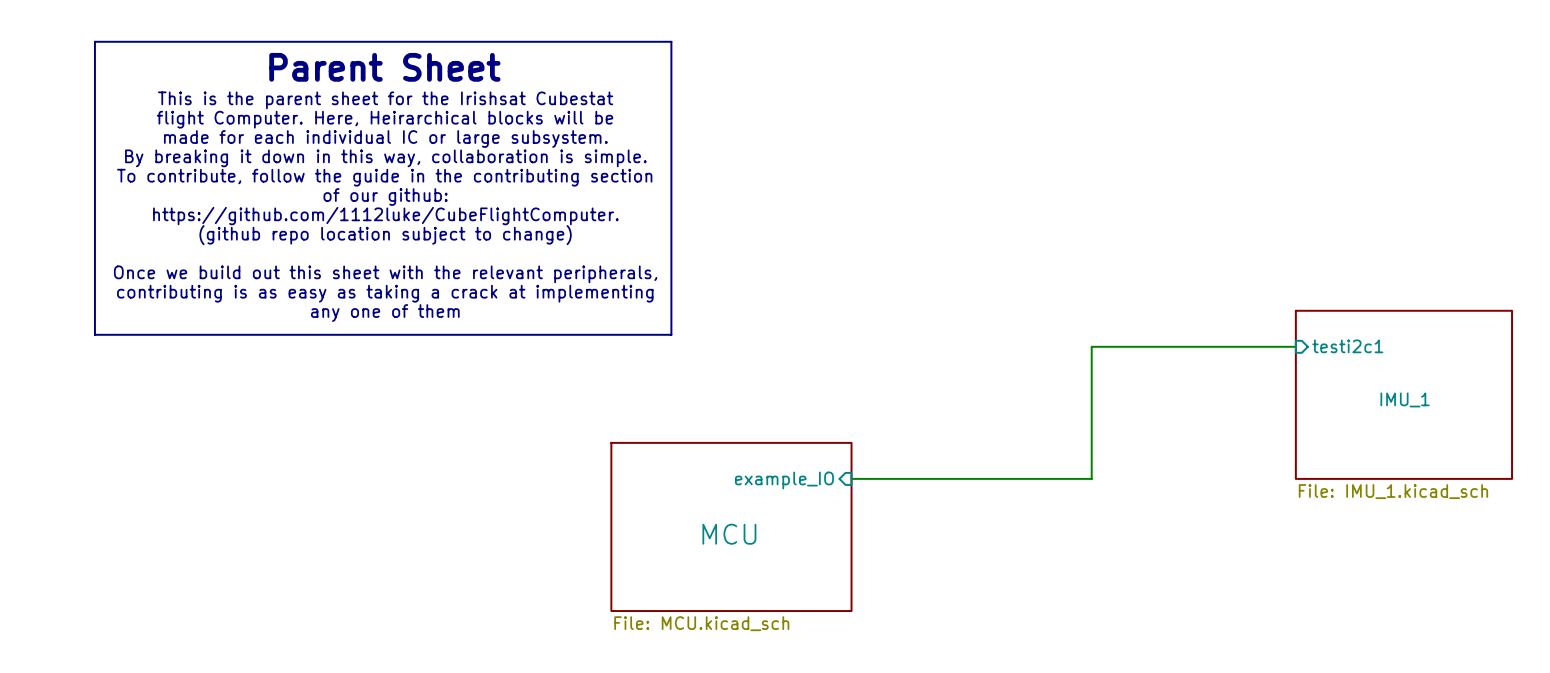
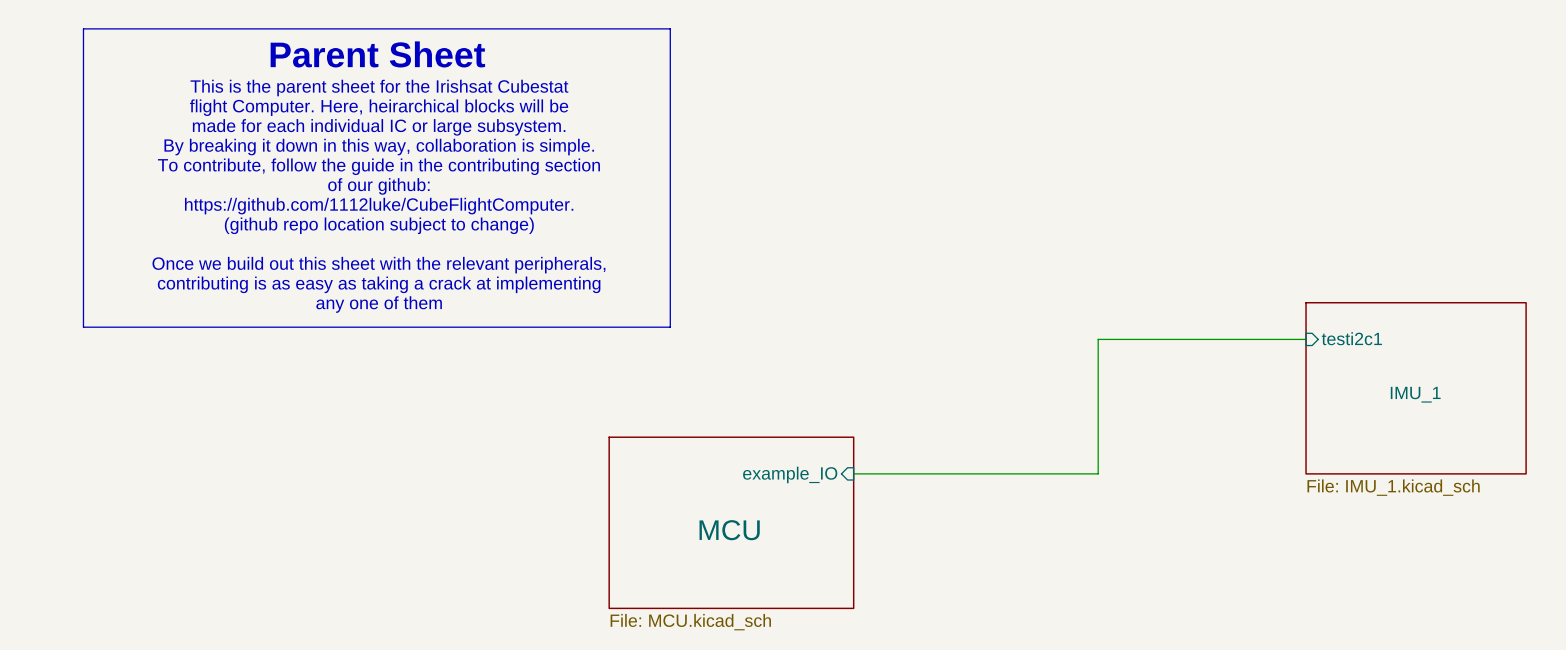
text: flight Computer. Here, Heirarchical blocks will be (385, 119) -> flight Computer. Here, heirarchical blocks will be (379, 107)

